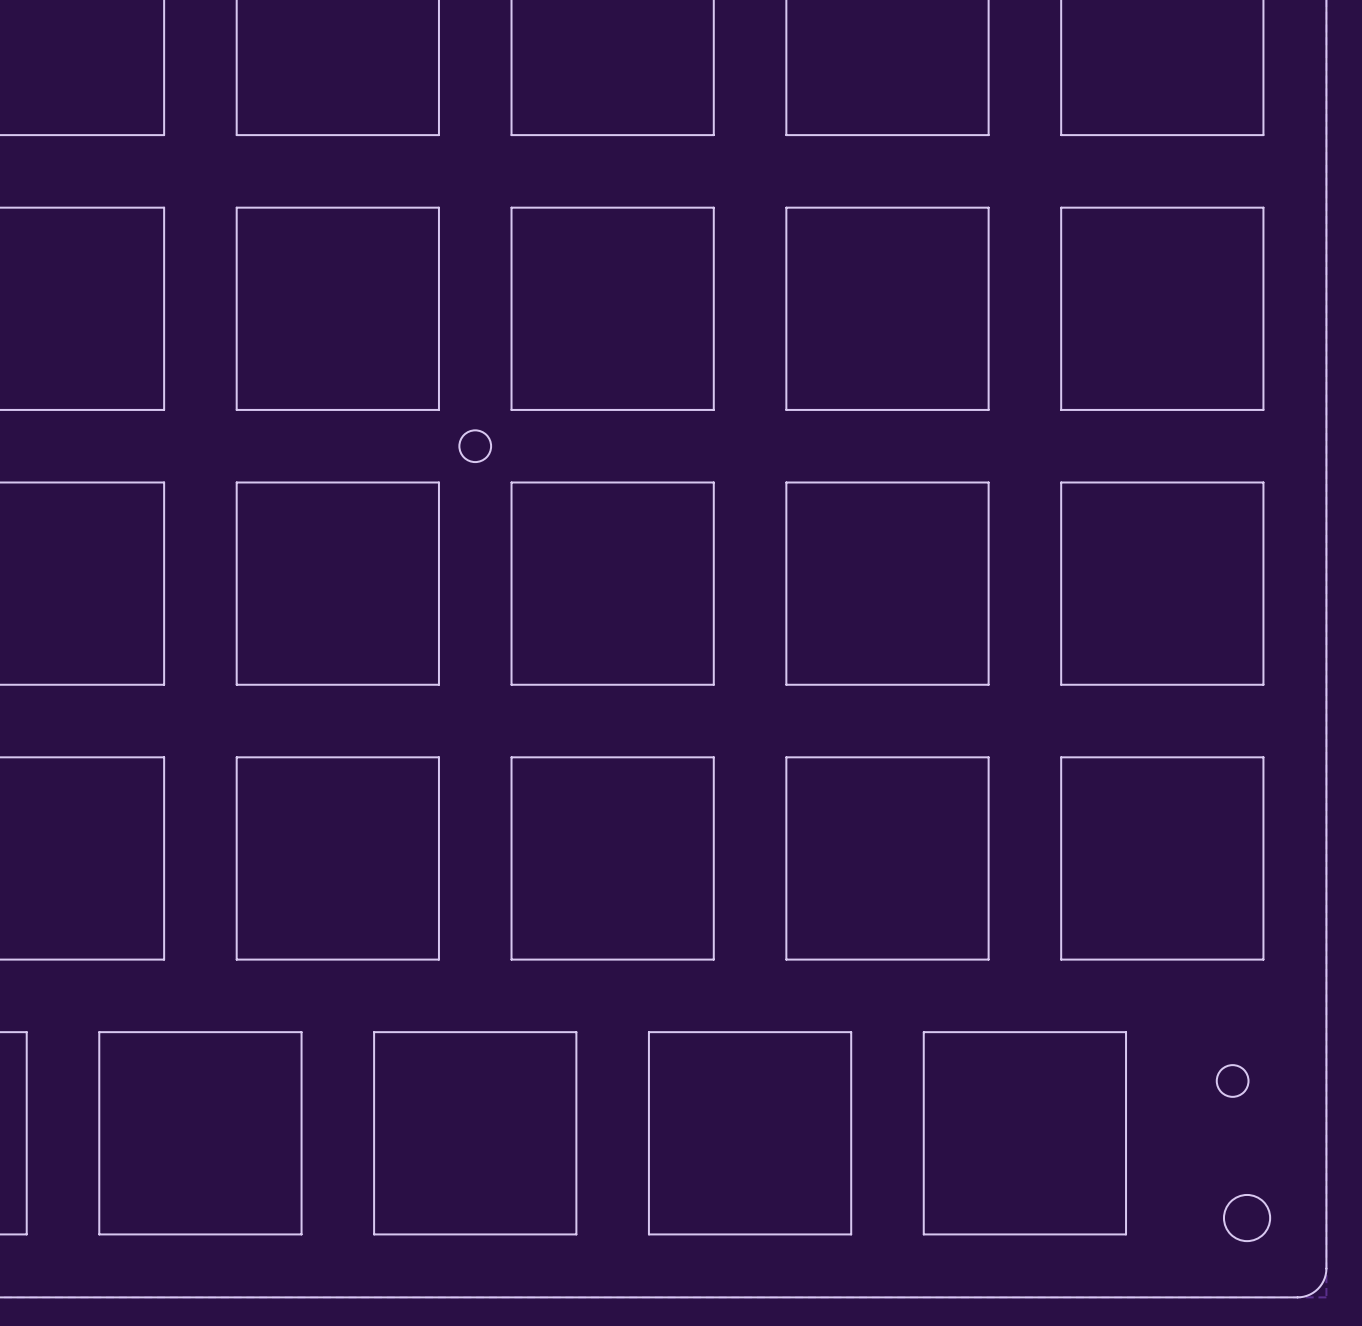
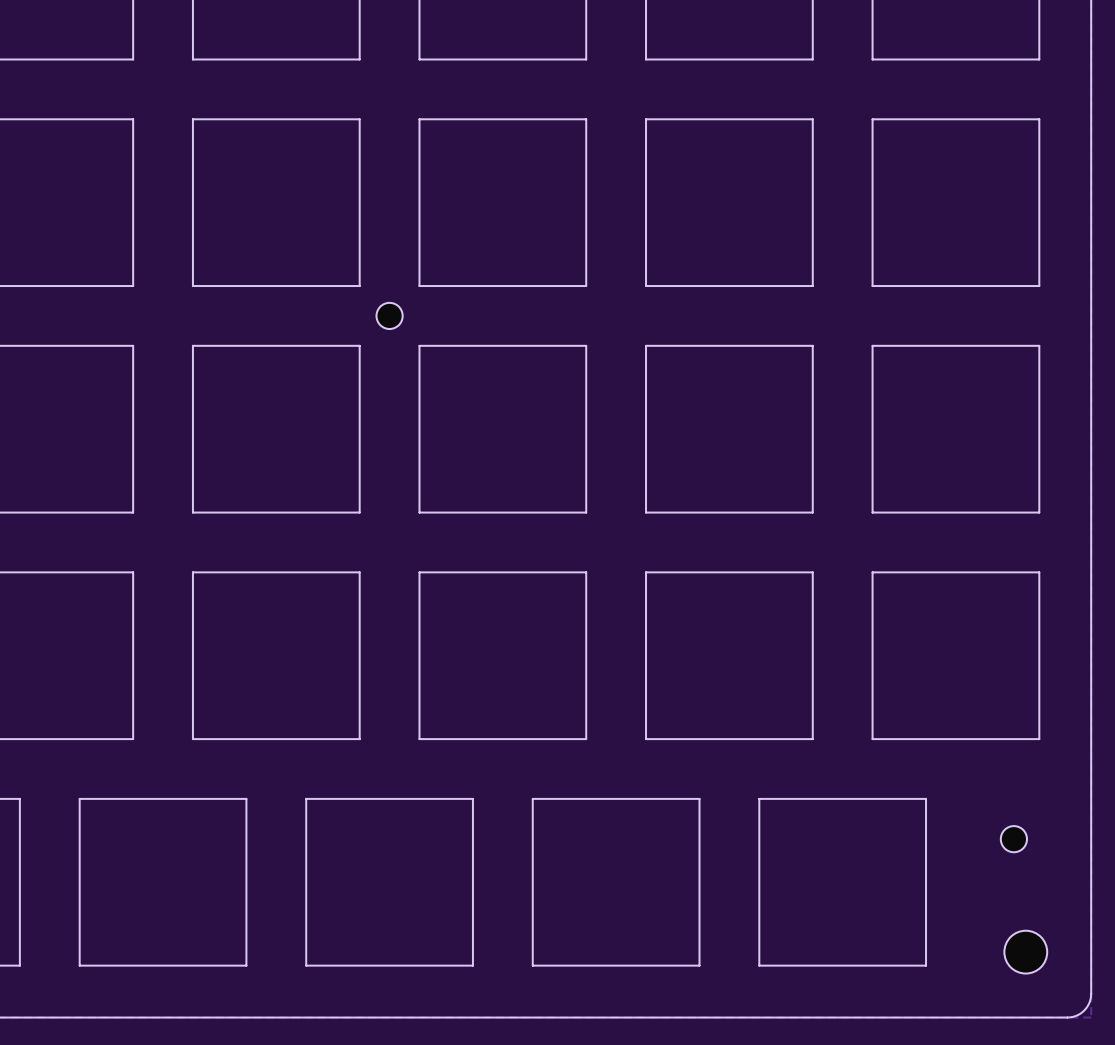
round board edge: [459, 429, 492, 463] -> none
part: none -> (389, 315)
round board edge: [1216, 1064, 1249, 1098] -> none
part: none -> (1013, 839)
round board edge: [1223, 1194, 1271, 1242] -> none
part: none -> (1025, 952)

